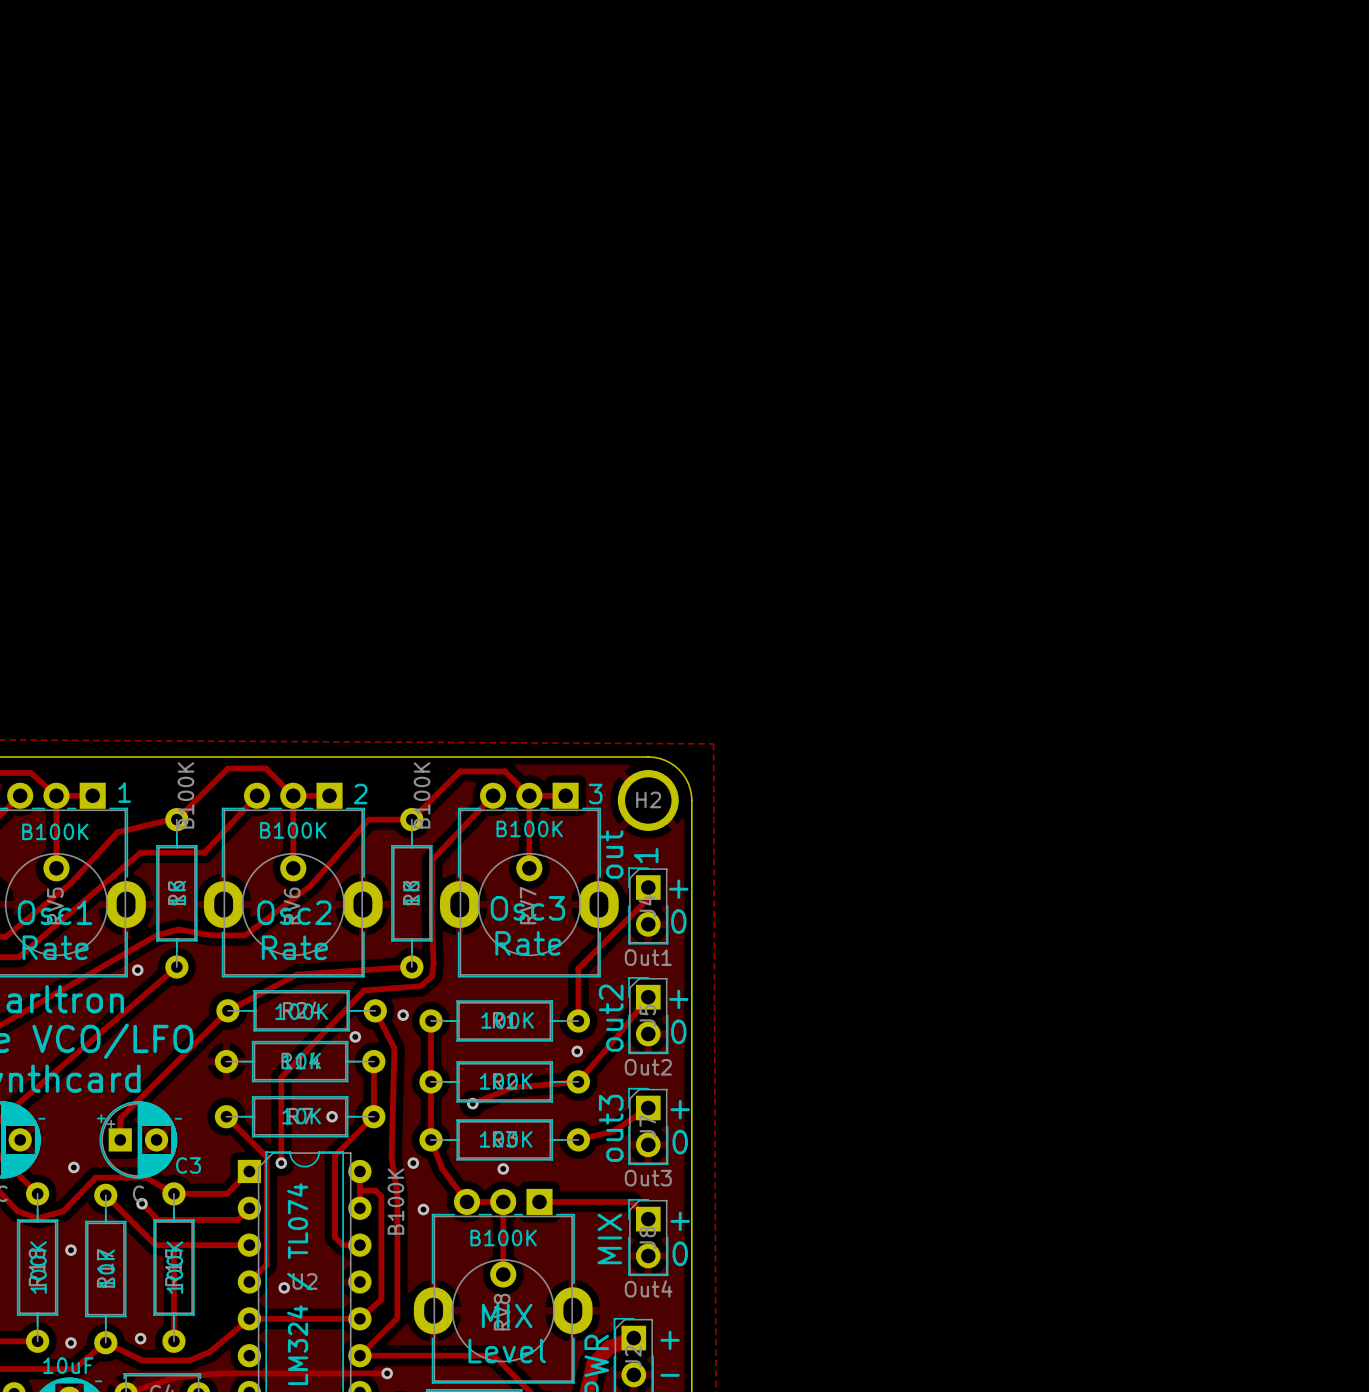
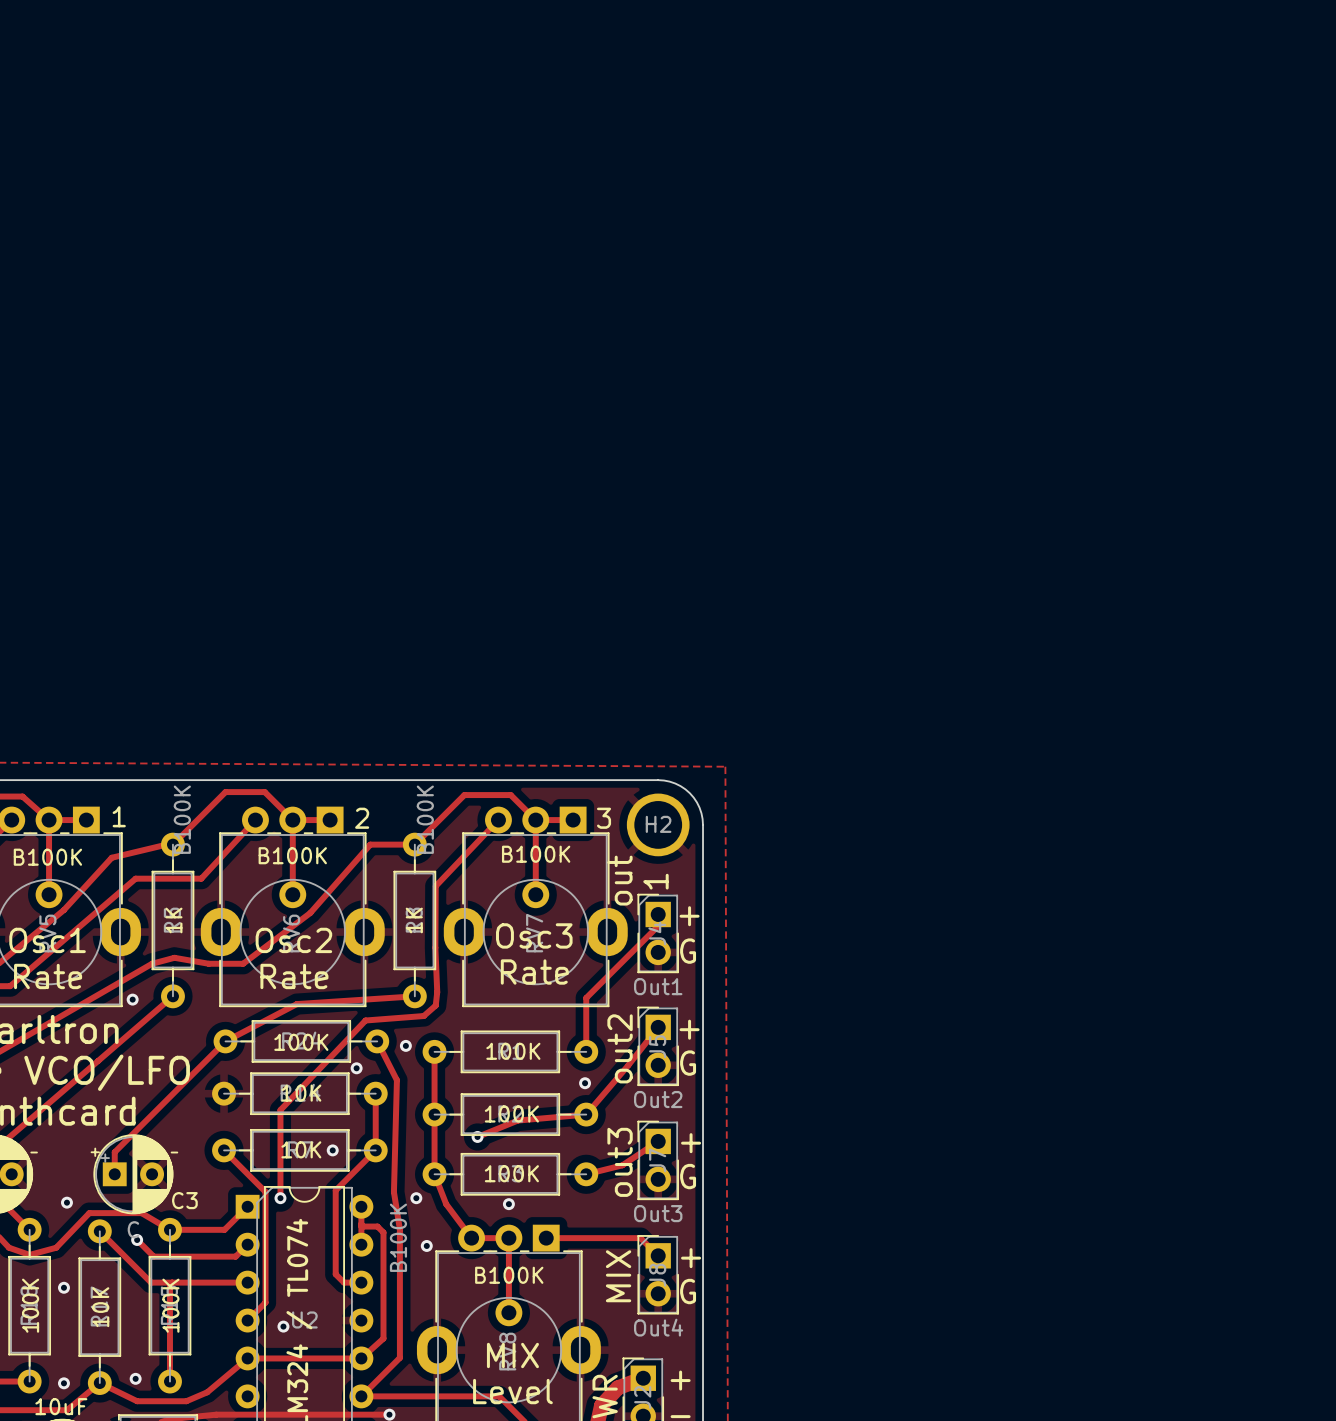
text: 0 (678, 921) -> G (688, 951)
text: 0 (678, 1031) -> G (688, 1063)
text: 0 (680, 1142) -> G (688, 1176)
text: 0 (680, 1253) -> G (688, 1291)

